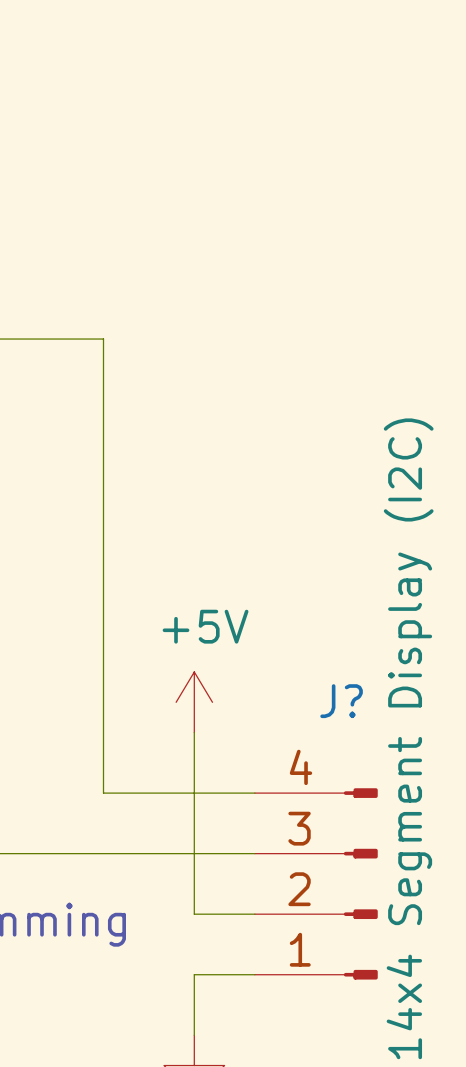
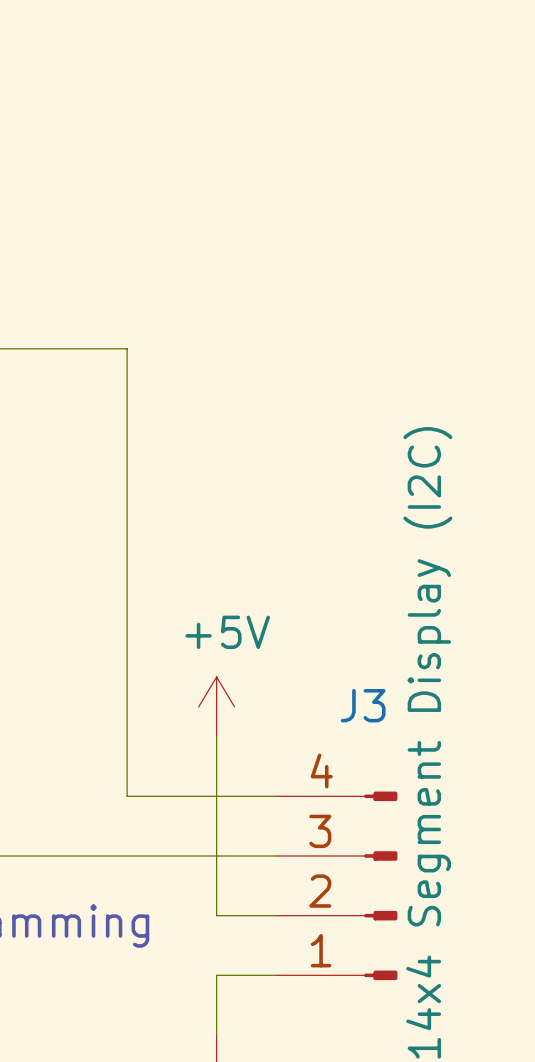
J? name: J? (341, 701) -> J3 (363, 705)

